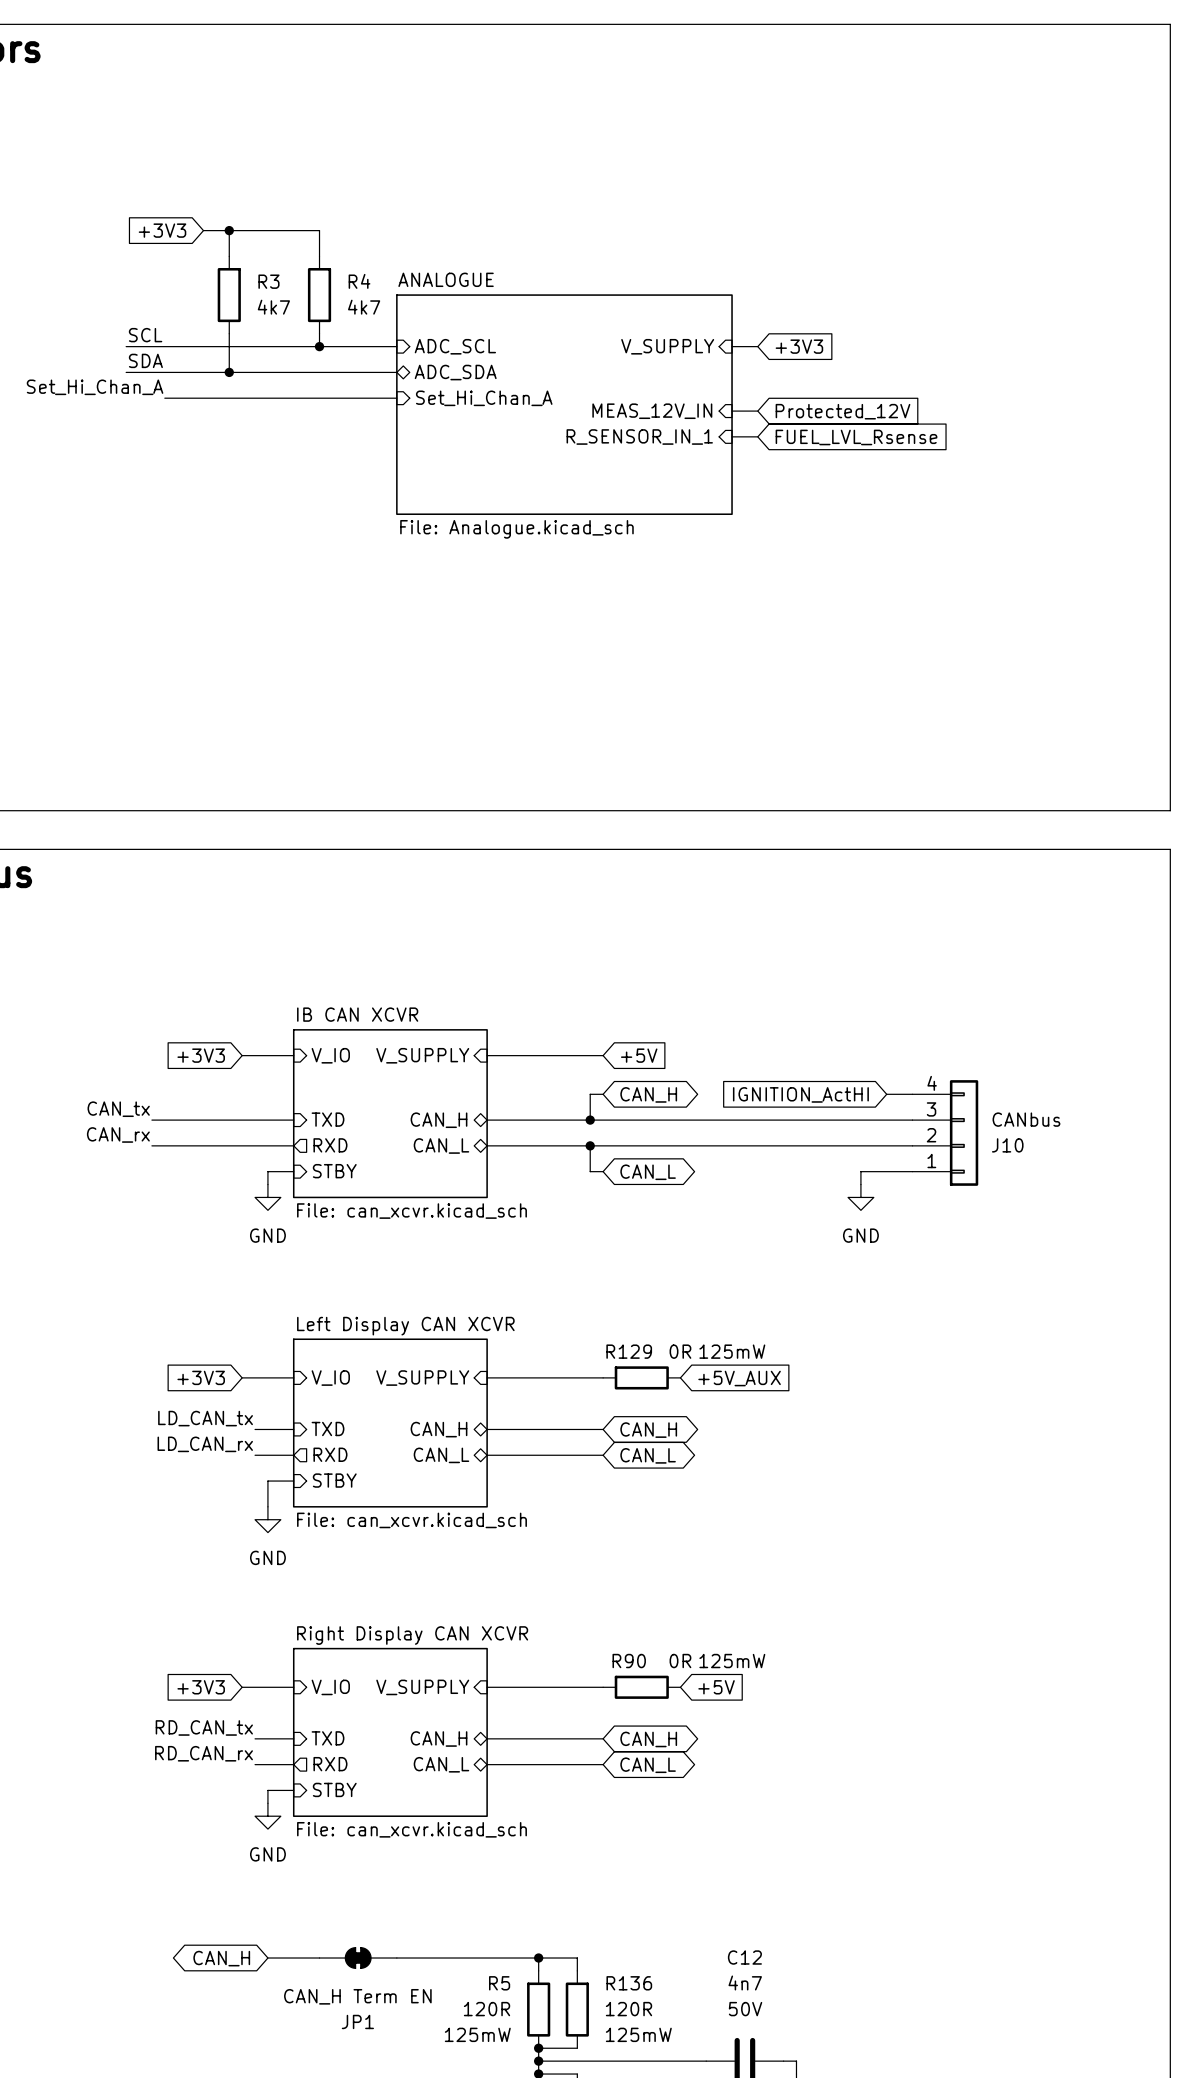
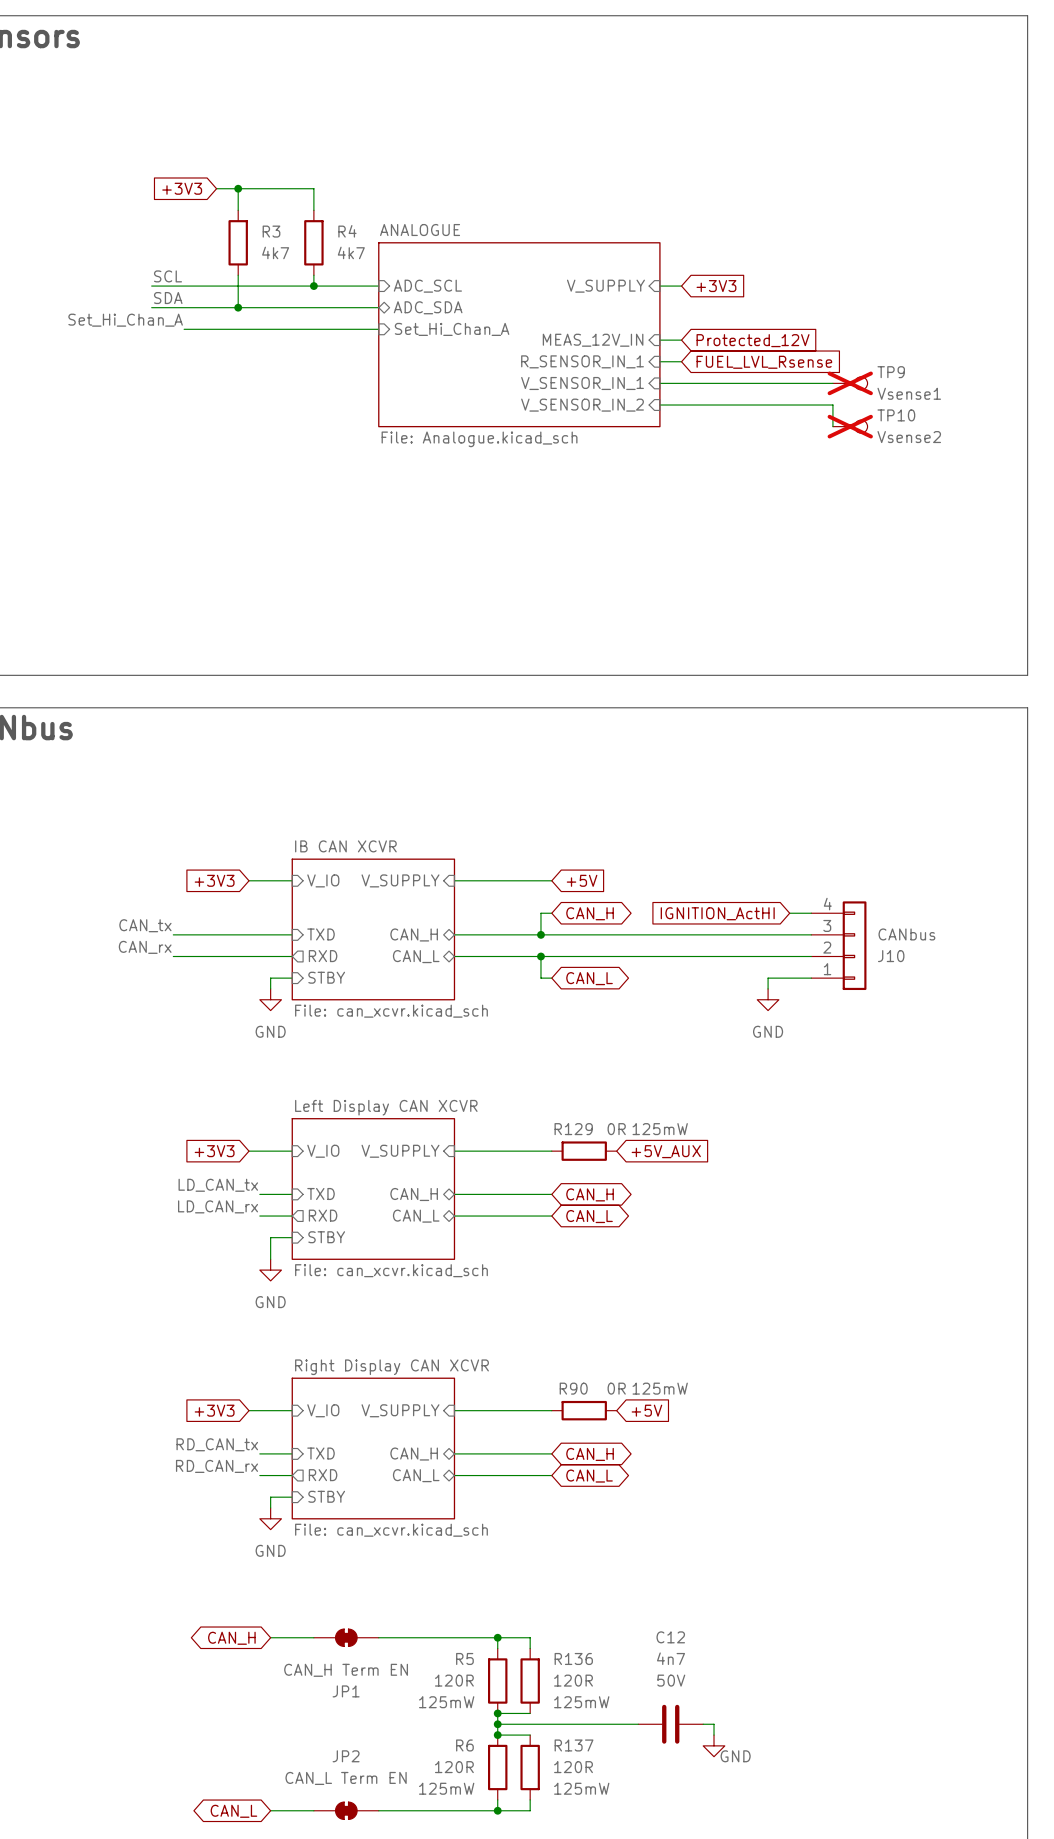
sheet pin: none -> V_SENSOR_IN_1 (582, 383)
wire: none -> (659, 383) (832, 383)
TP9: none -> Vsense1 (850, 383)
sheet pin: none -> V_SENSOR_IN_2 (582, 405)
wire: none -> (659, 405) (832, 405) (832, 426)
TP10: none -> Vsense2 (850, 426)

